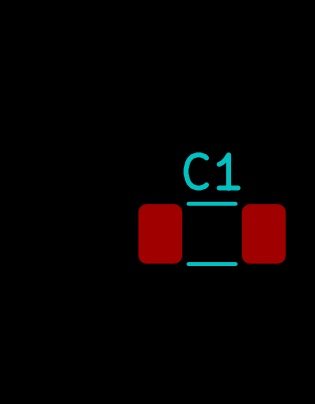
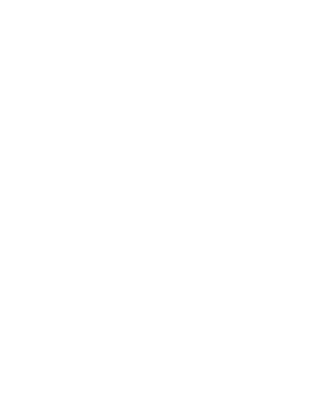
C1: (212, 233) -> none

